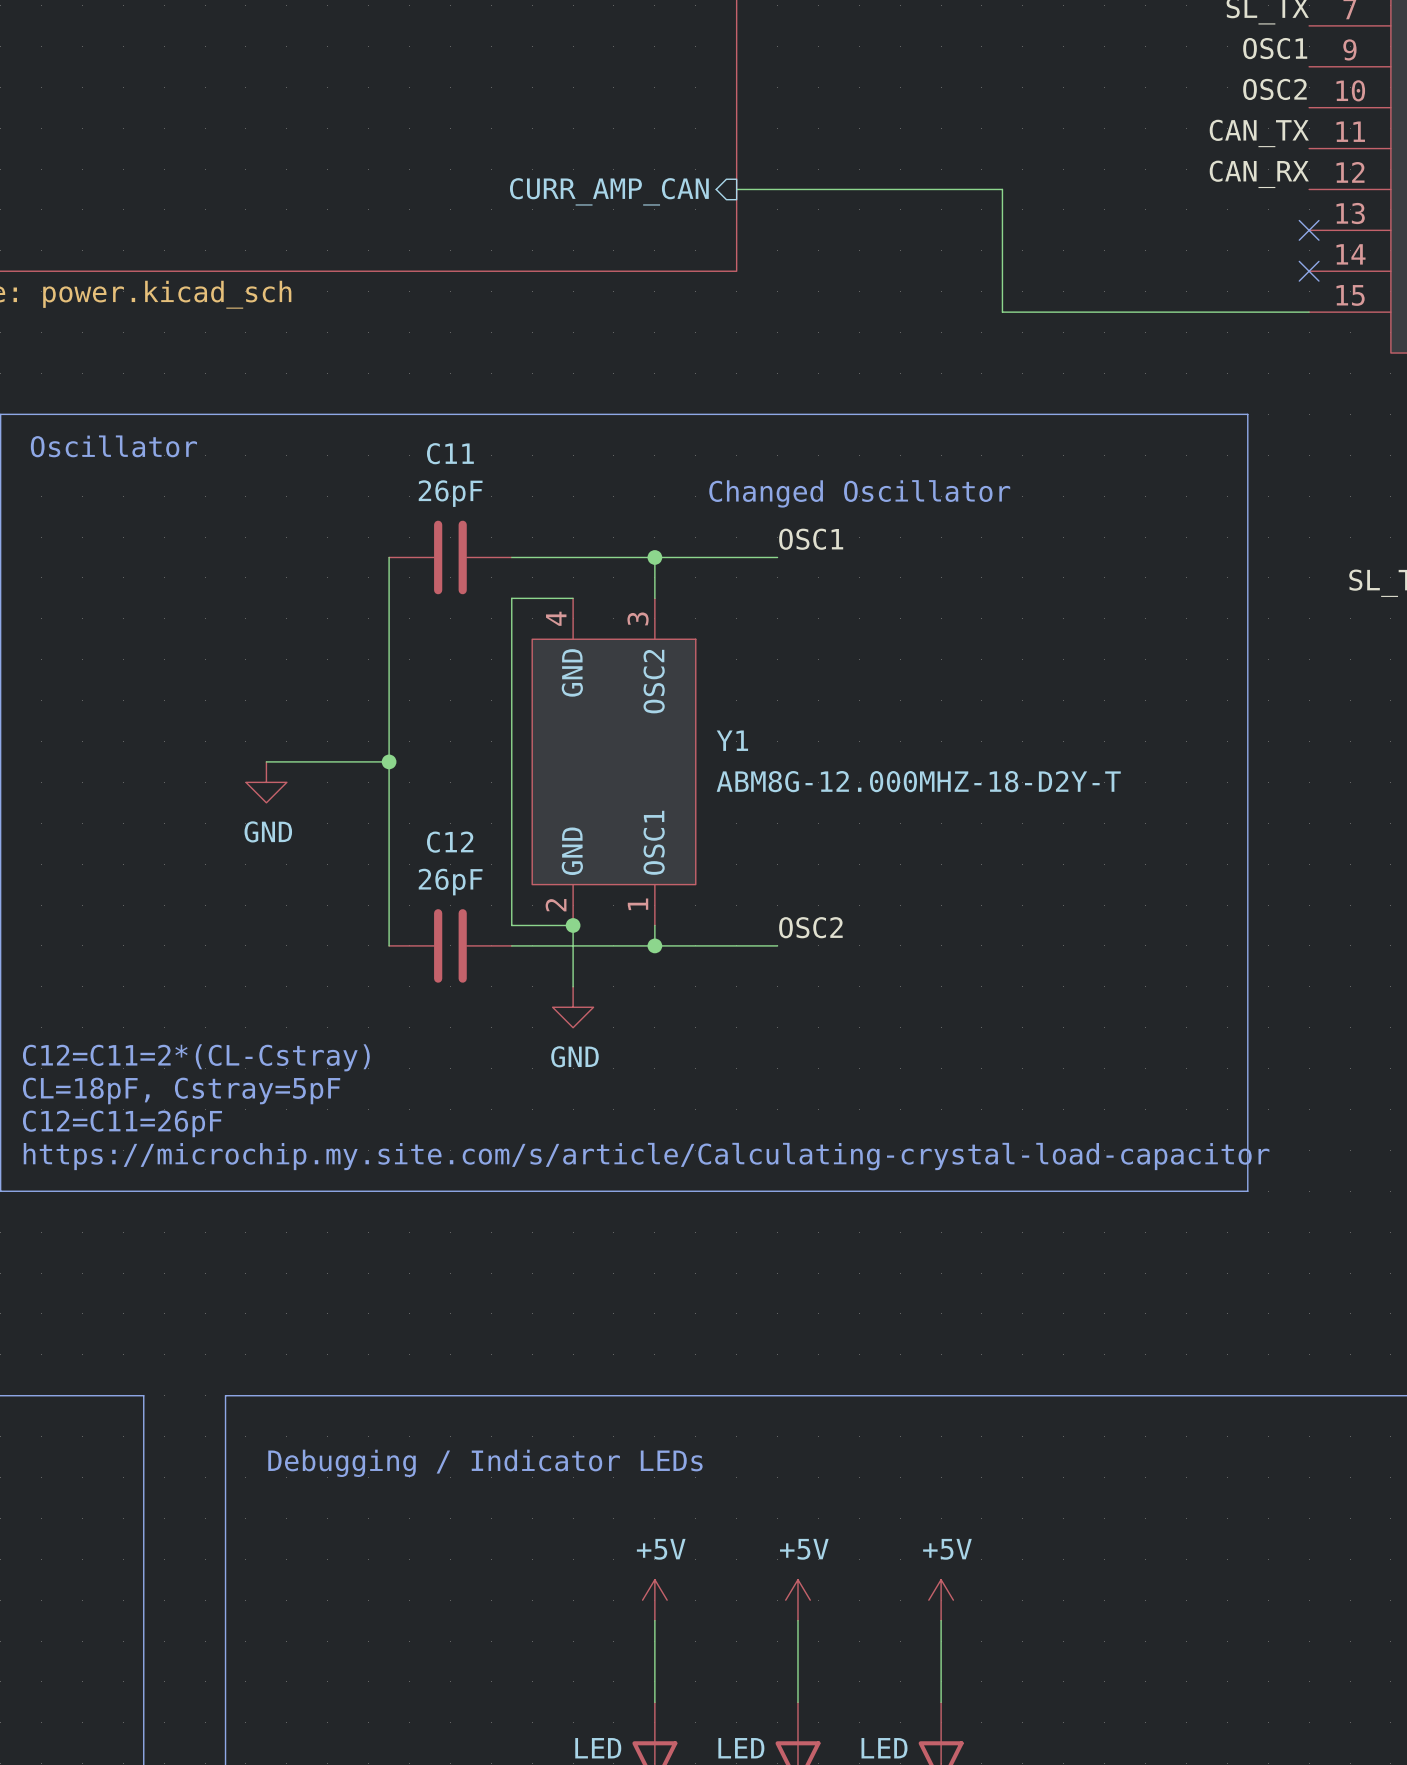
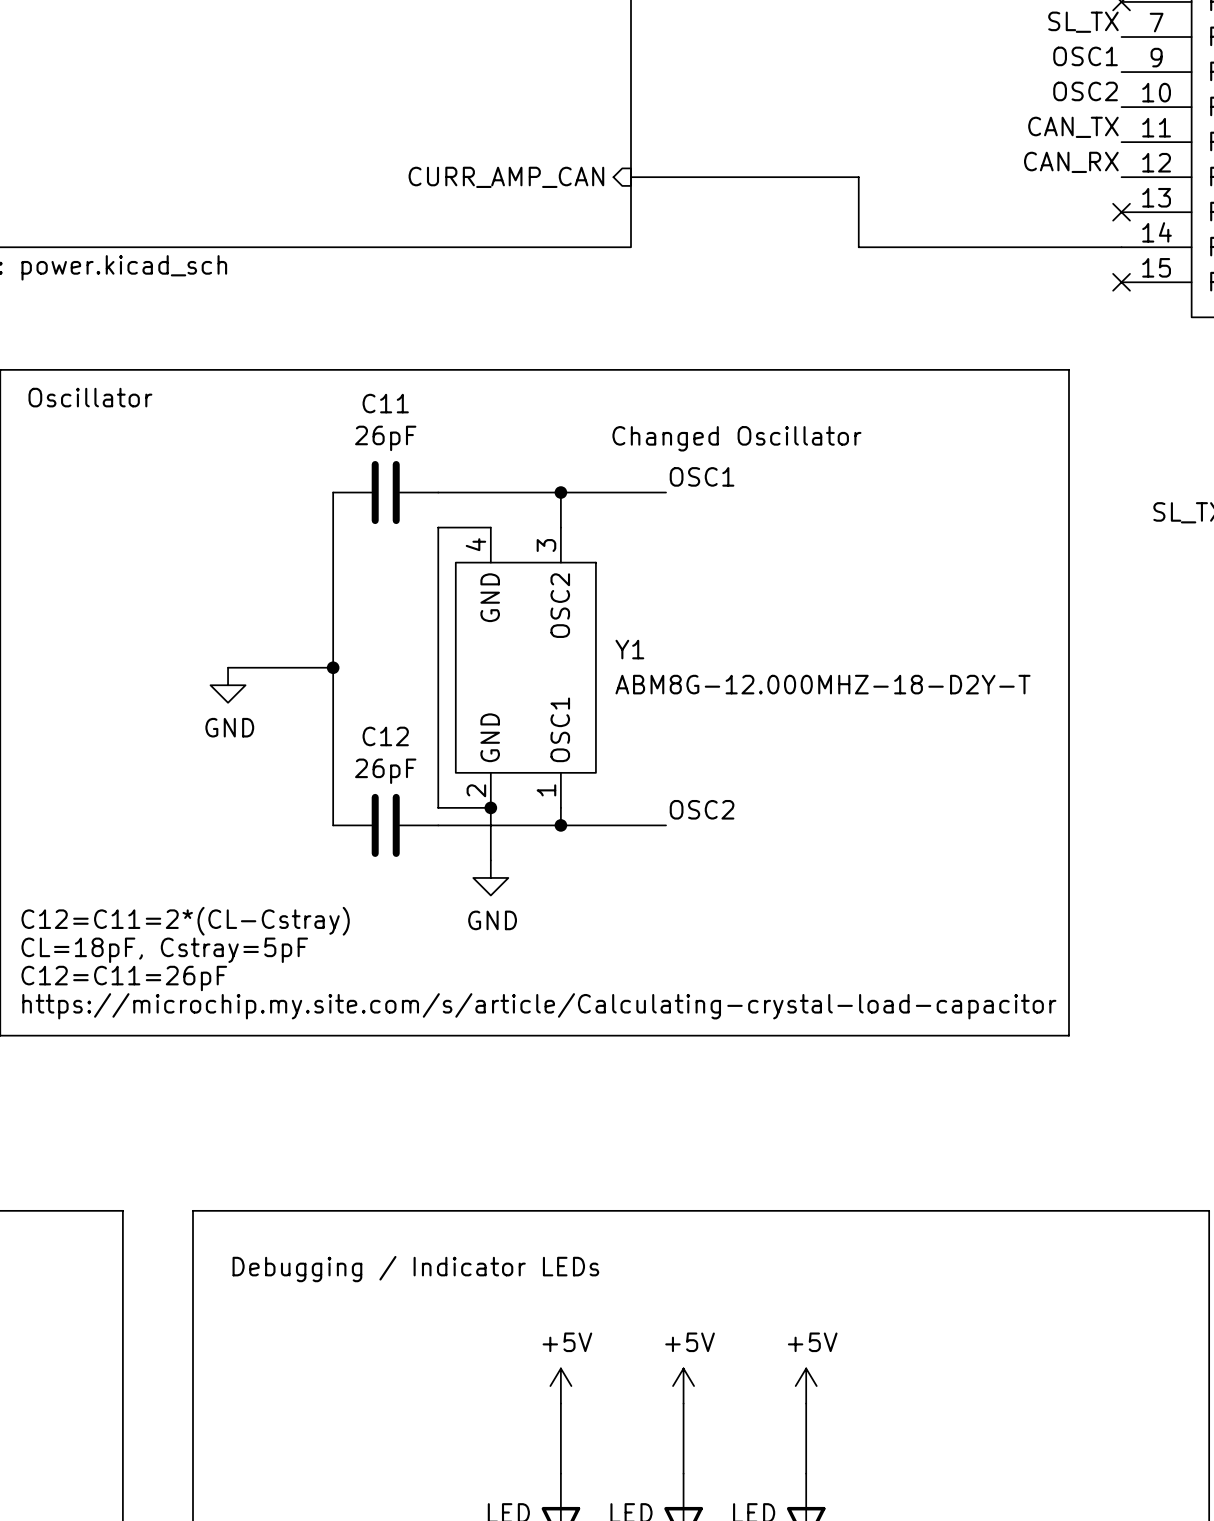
wire: (1002, 271) (1002, 312) (1309, 312) -> (858, 247) (1121, 247)
no-connect mark position: (1309, 271) -> (1121, 282)

